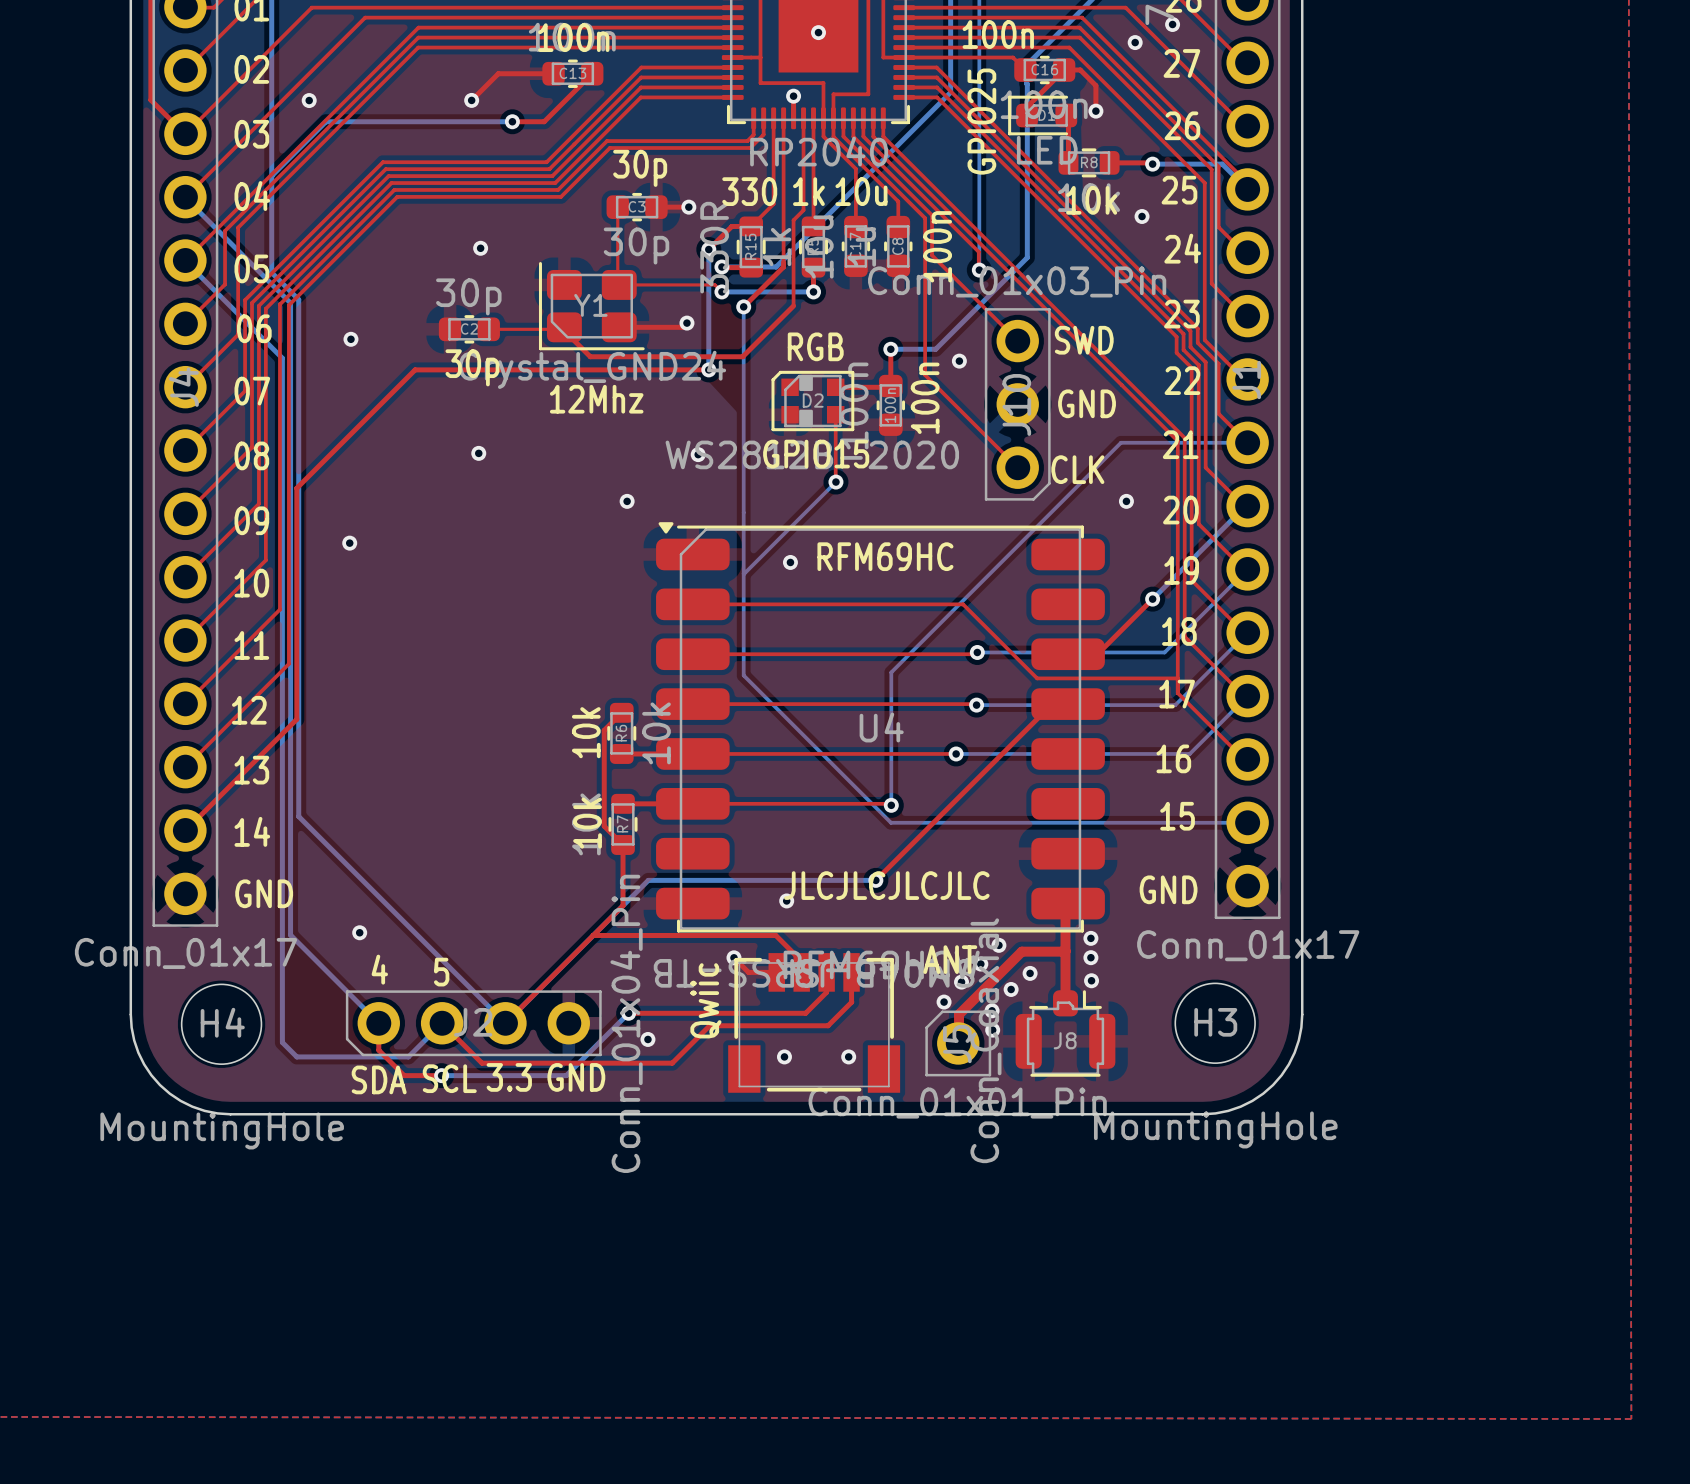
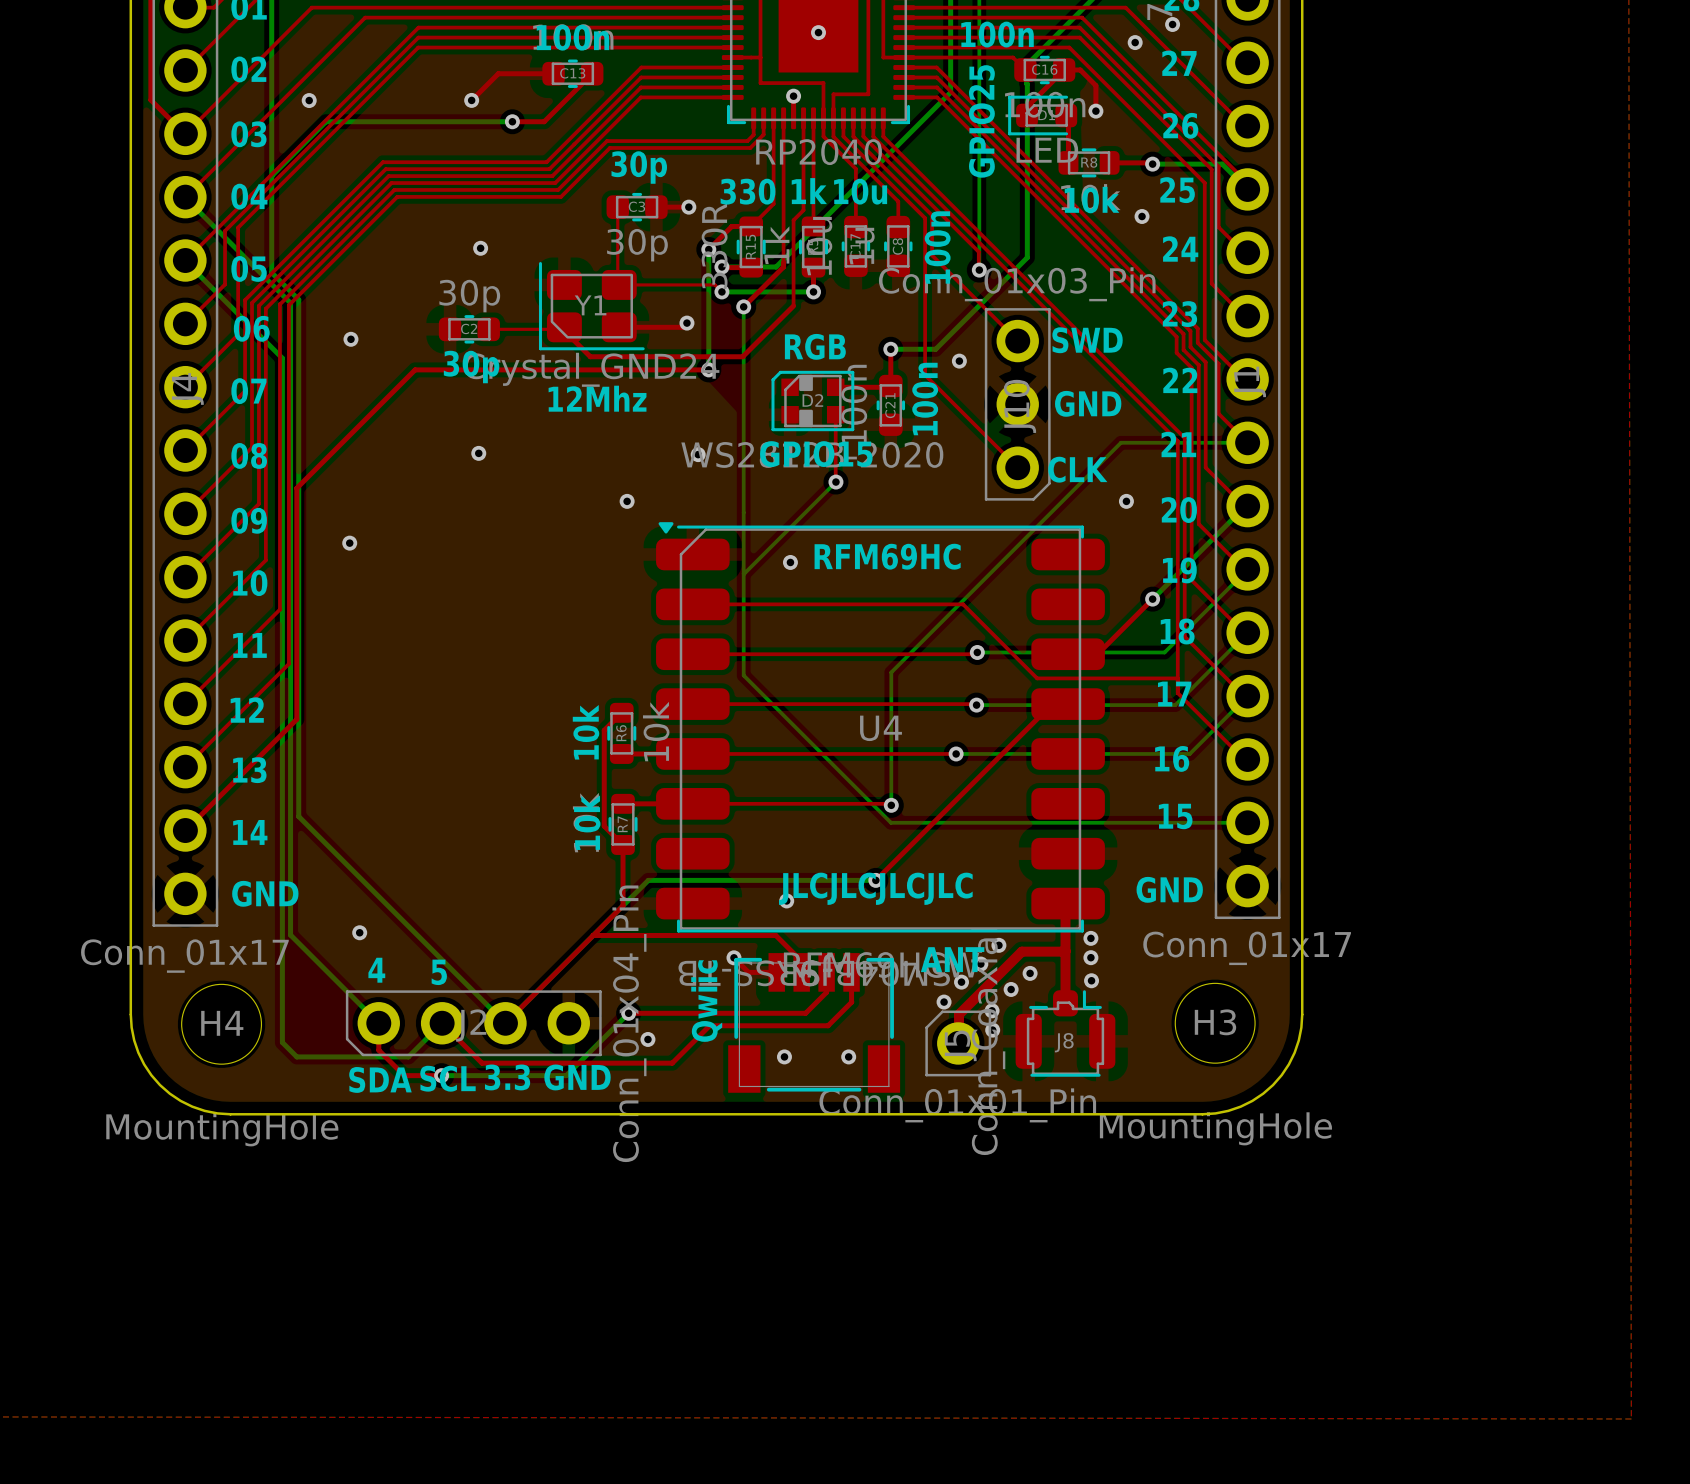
100n name: 100n (890, 405) -> C21 (890, 405)

